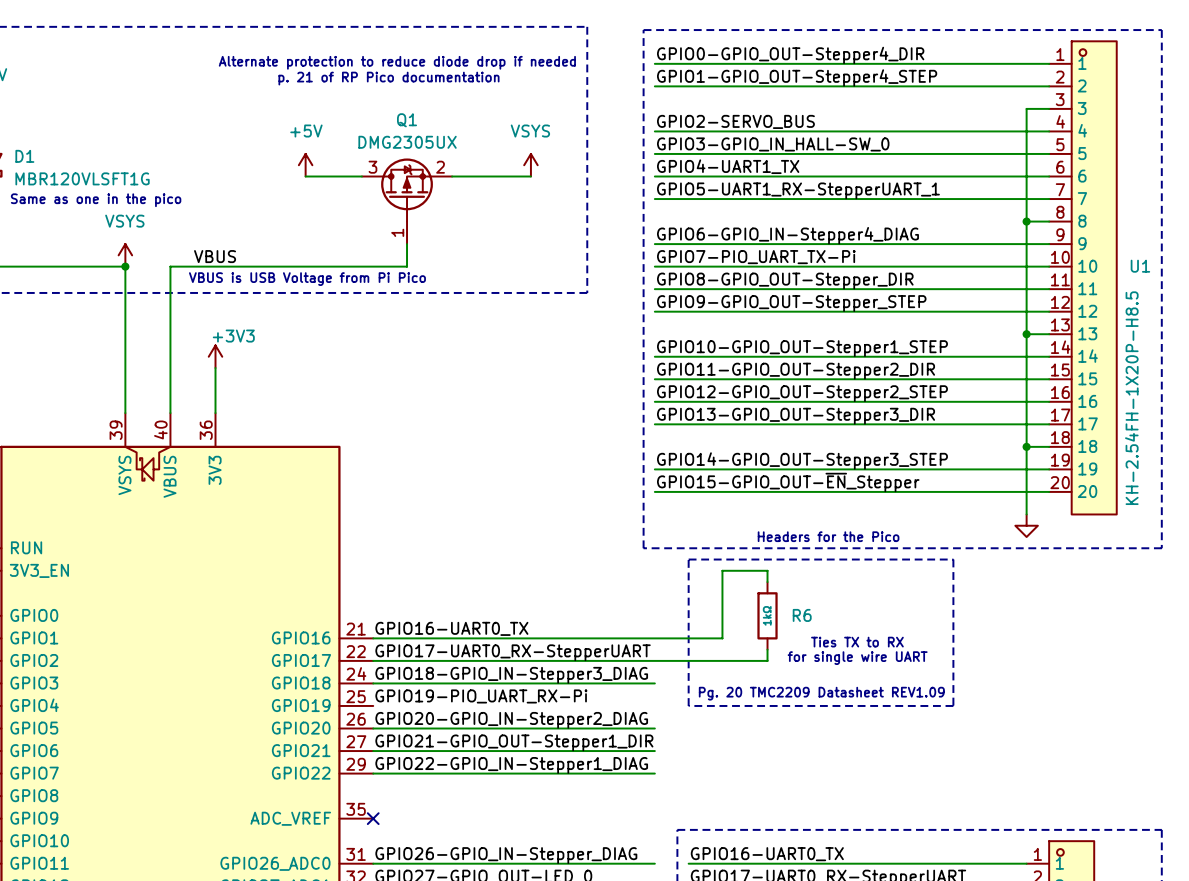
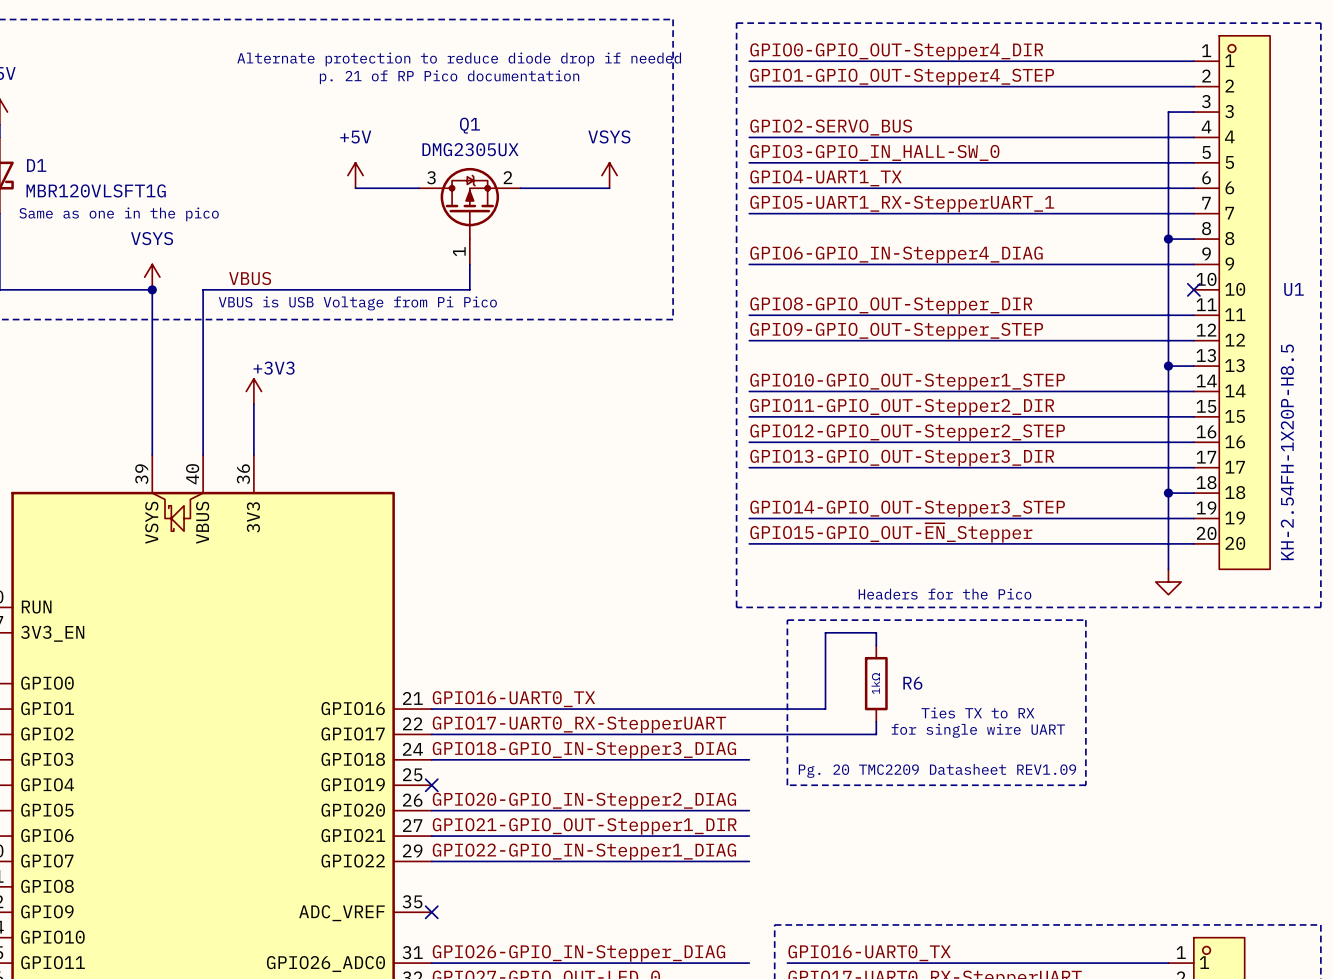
label: GPIO7-PIO_UART_TX-Pi (756, 257) -> none
wire: (654, 266) (1049, 266) -> none
no-connect mark: none -> (1193, 289)
label: GPIO19-PIO_UART_RX-Pi (481, 696) -> none
no-connect mark: none -> (431, 785)

